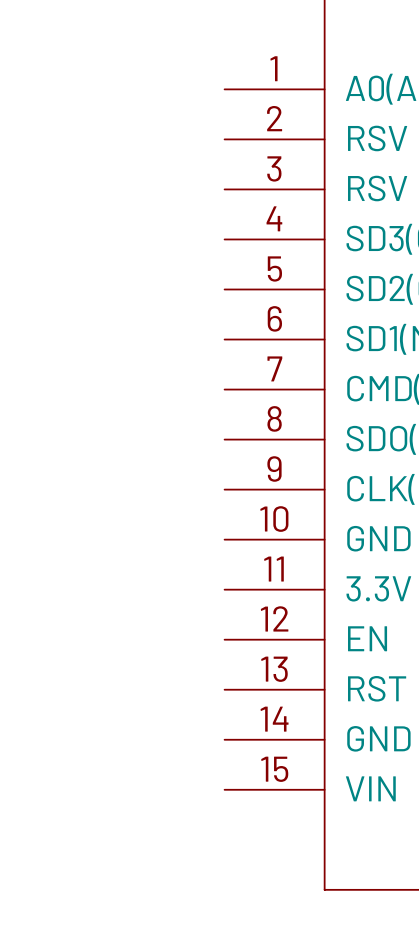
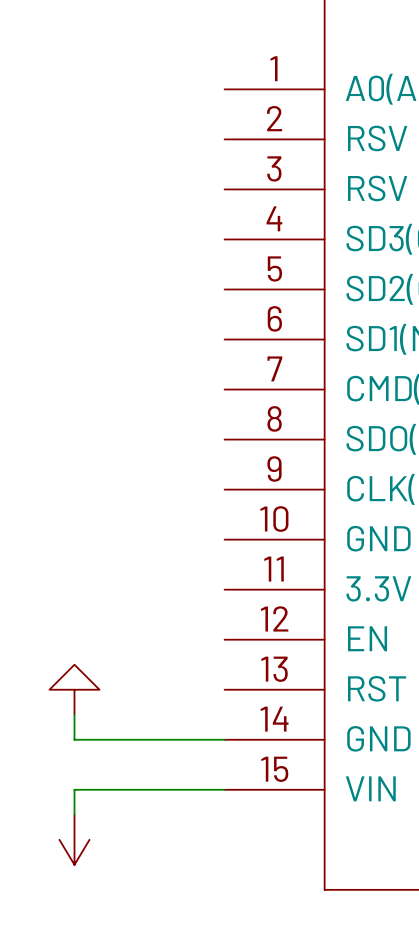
power symbol: none -> (74, 689)
wire: none -> (74, 714) (74, 739) (224, 739)
wire: none -> (224, 789) (74, 789) (74, 814)
power symbol: none -> (74, 839)

